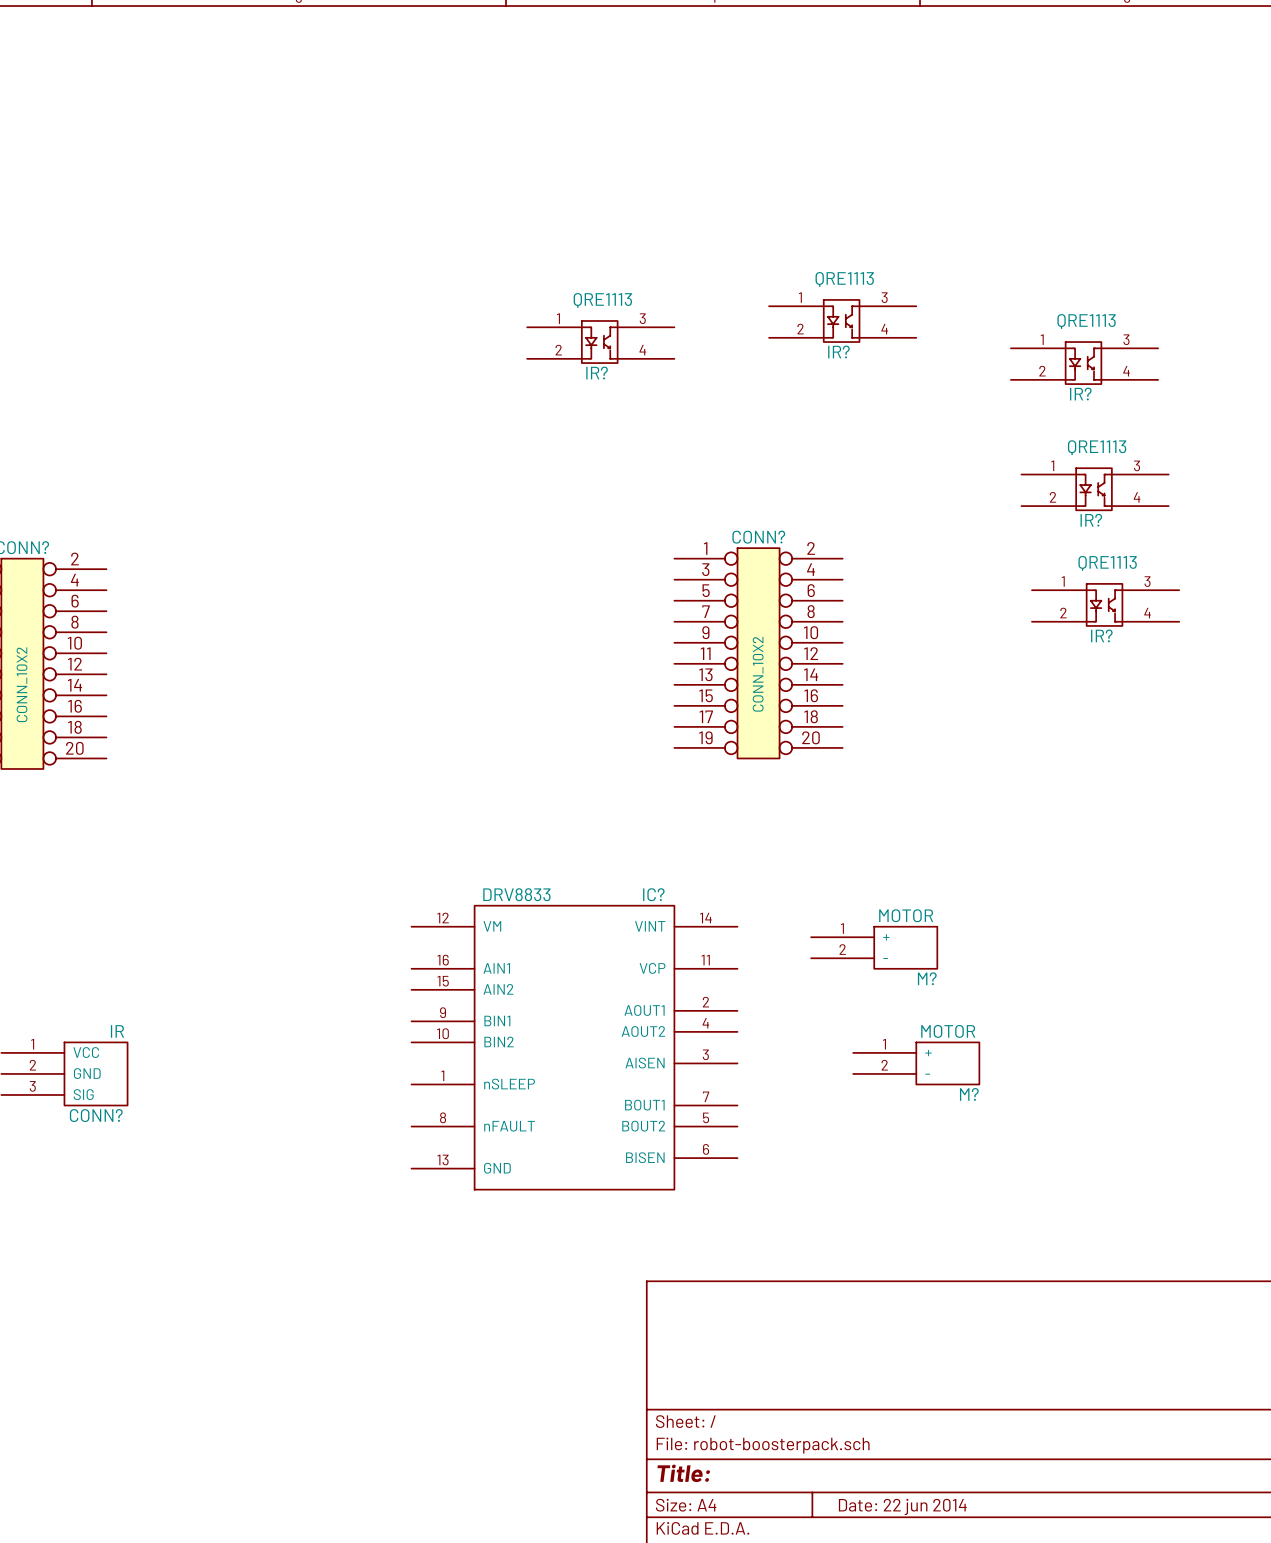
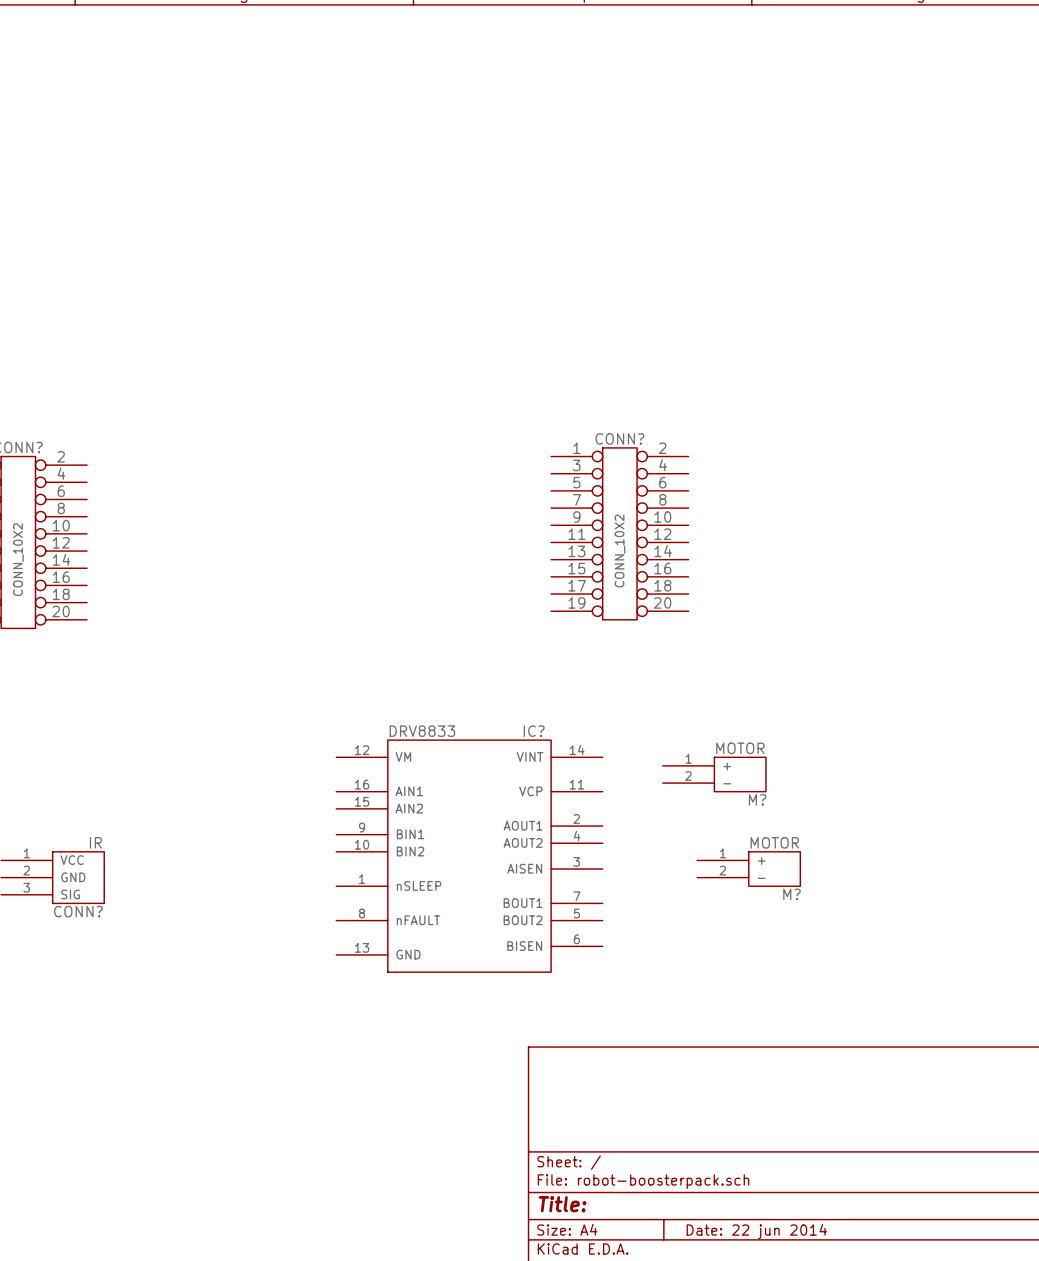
IR?: QRE1113 (842, 320) -> none
IR?: QRE1113 (600, 342) -> none
IR?: QRE1113 (1084, 363) -> none
IR?: QRE1113 (1095, 489) -> none
IR?: QRE1113 (1105, 604) -> none

